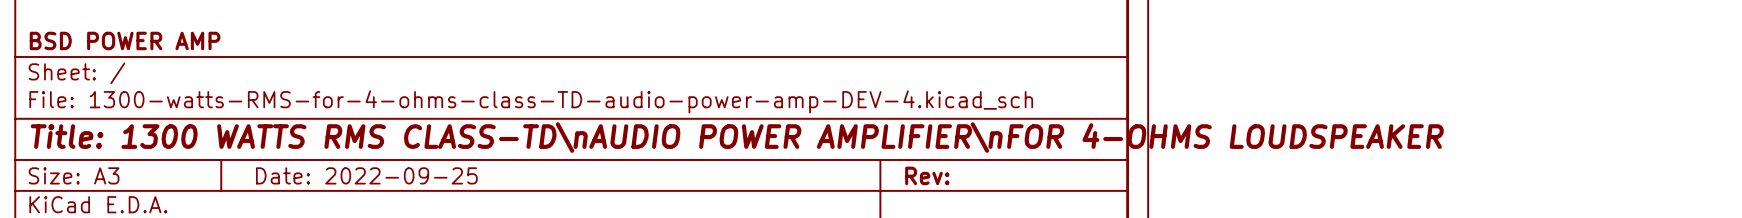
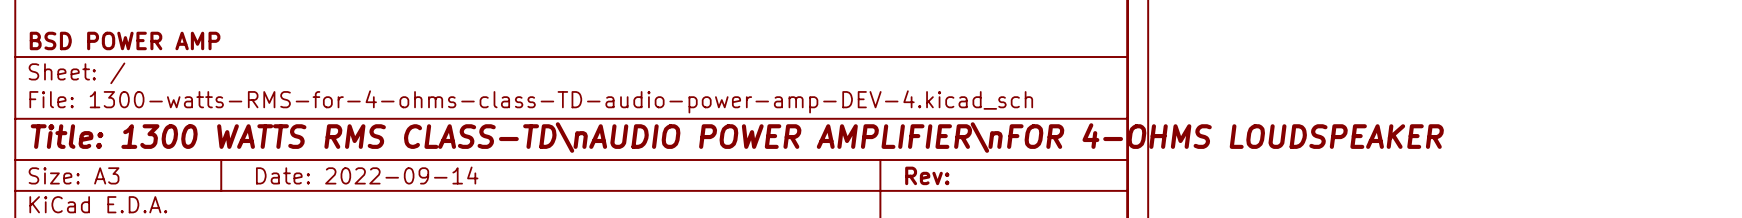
title block: Date: 2022-09-25 (366, 175) -> Date: 2022-09-14 (367, 175)

